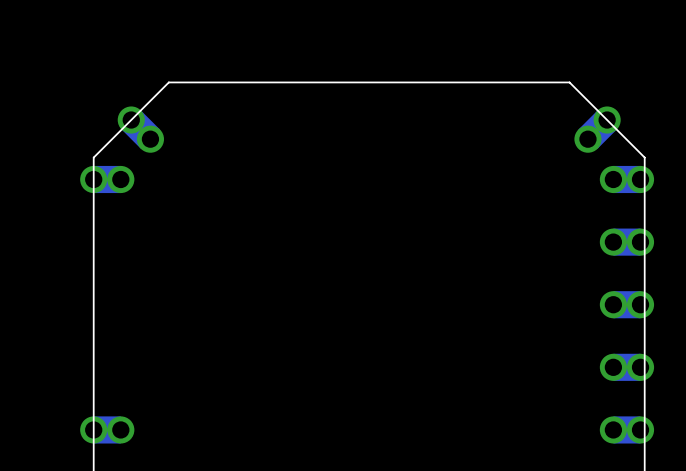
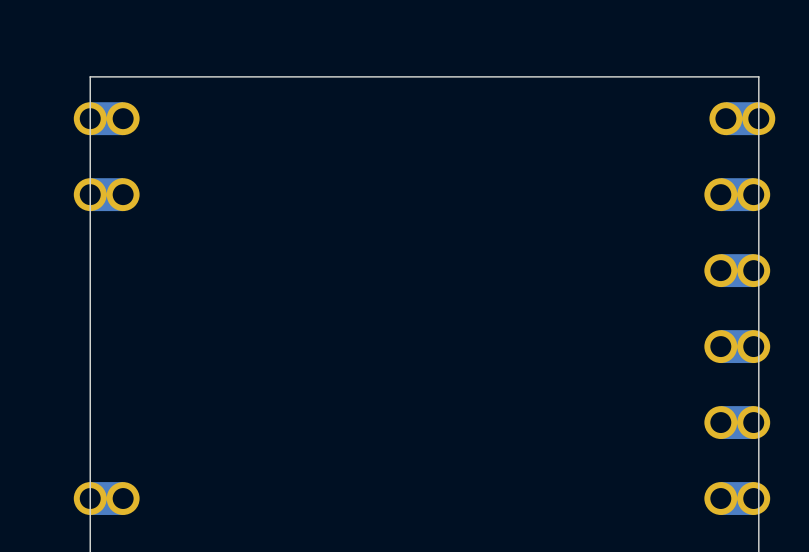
board edge: (168, 82) (93, 157) -> (181, 76) (90, 76) (90, 168)
board edge: (569, 82) (644, 157) -> (667, 76) (758, 76) (758, 168)
part: none -> (106, 118)
part: none -> (742, 118)
part: (140, 129) -> none
part: (597, 129) -> none

